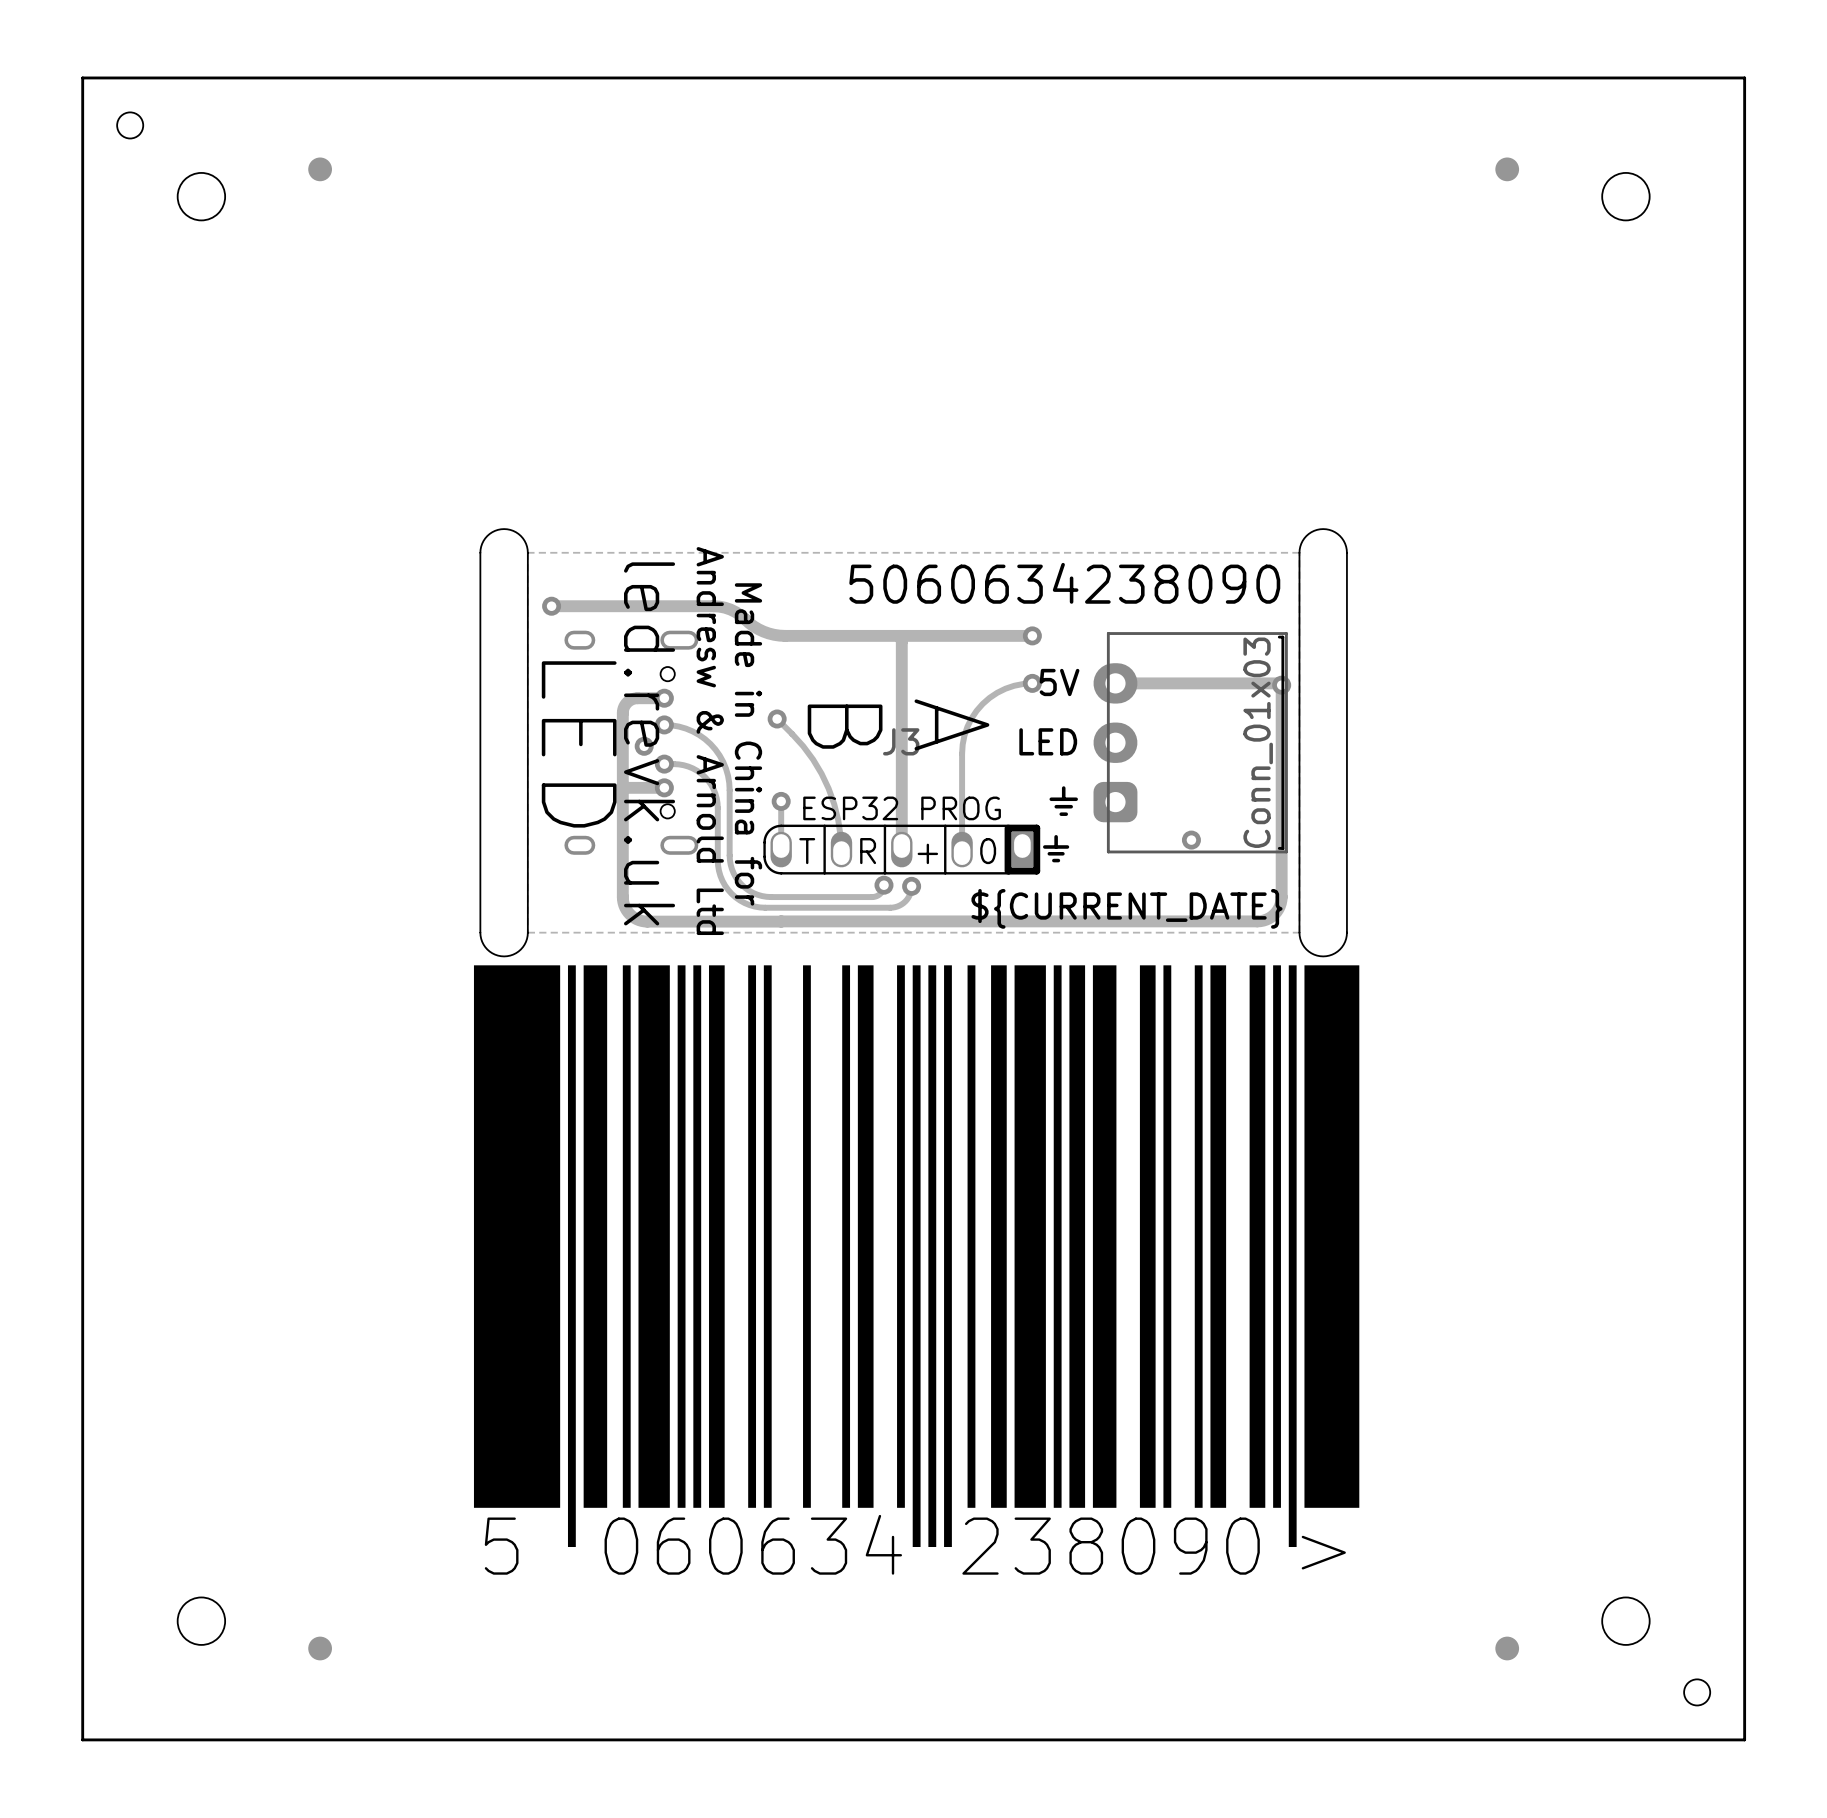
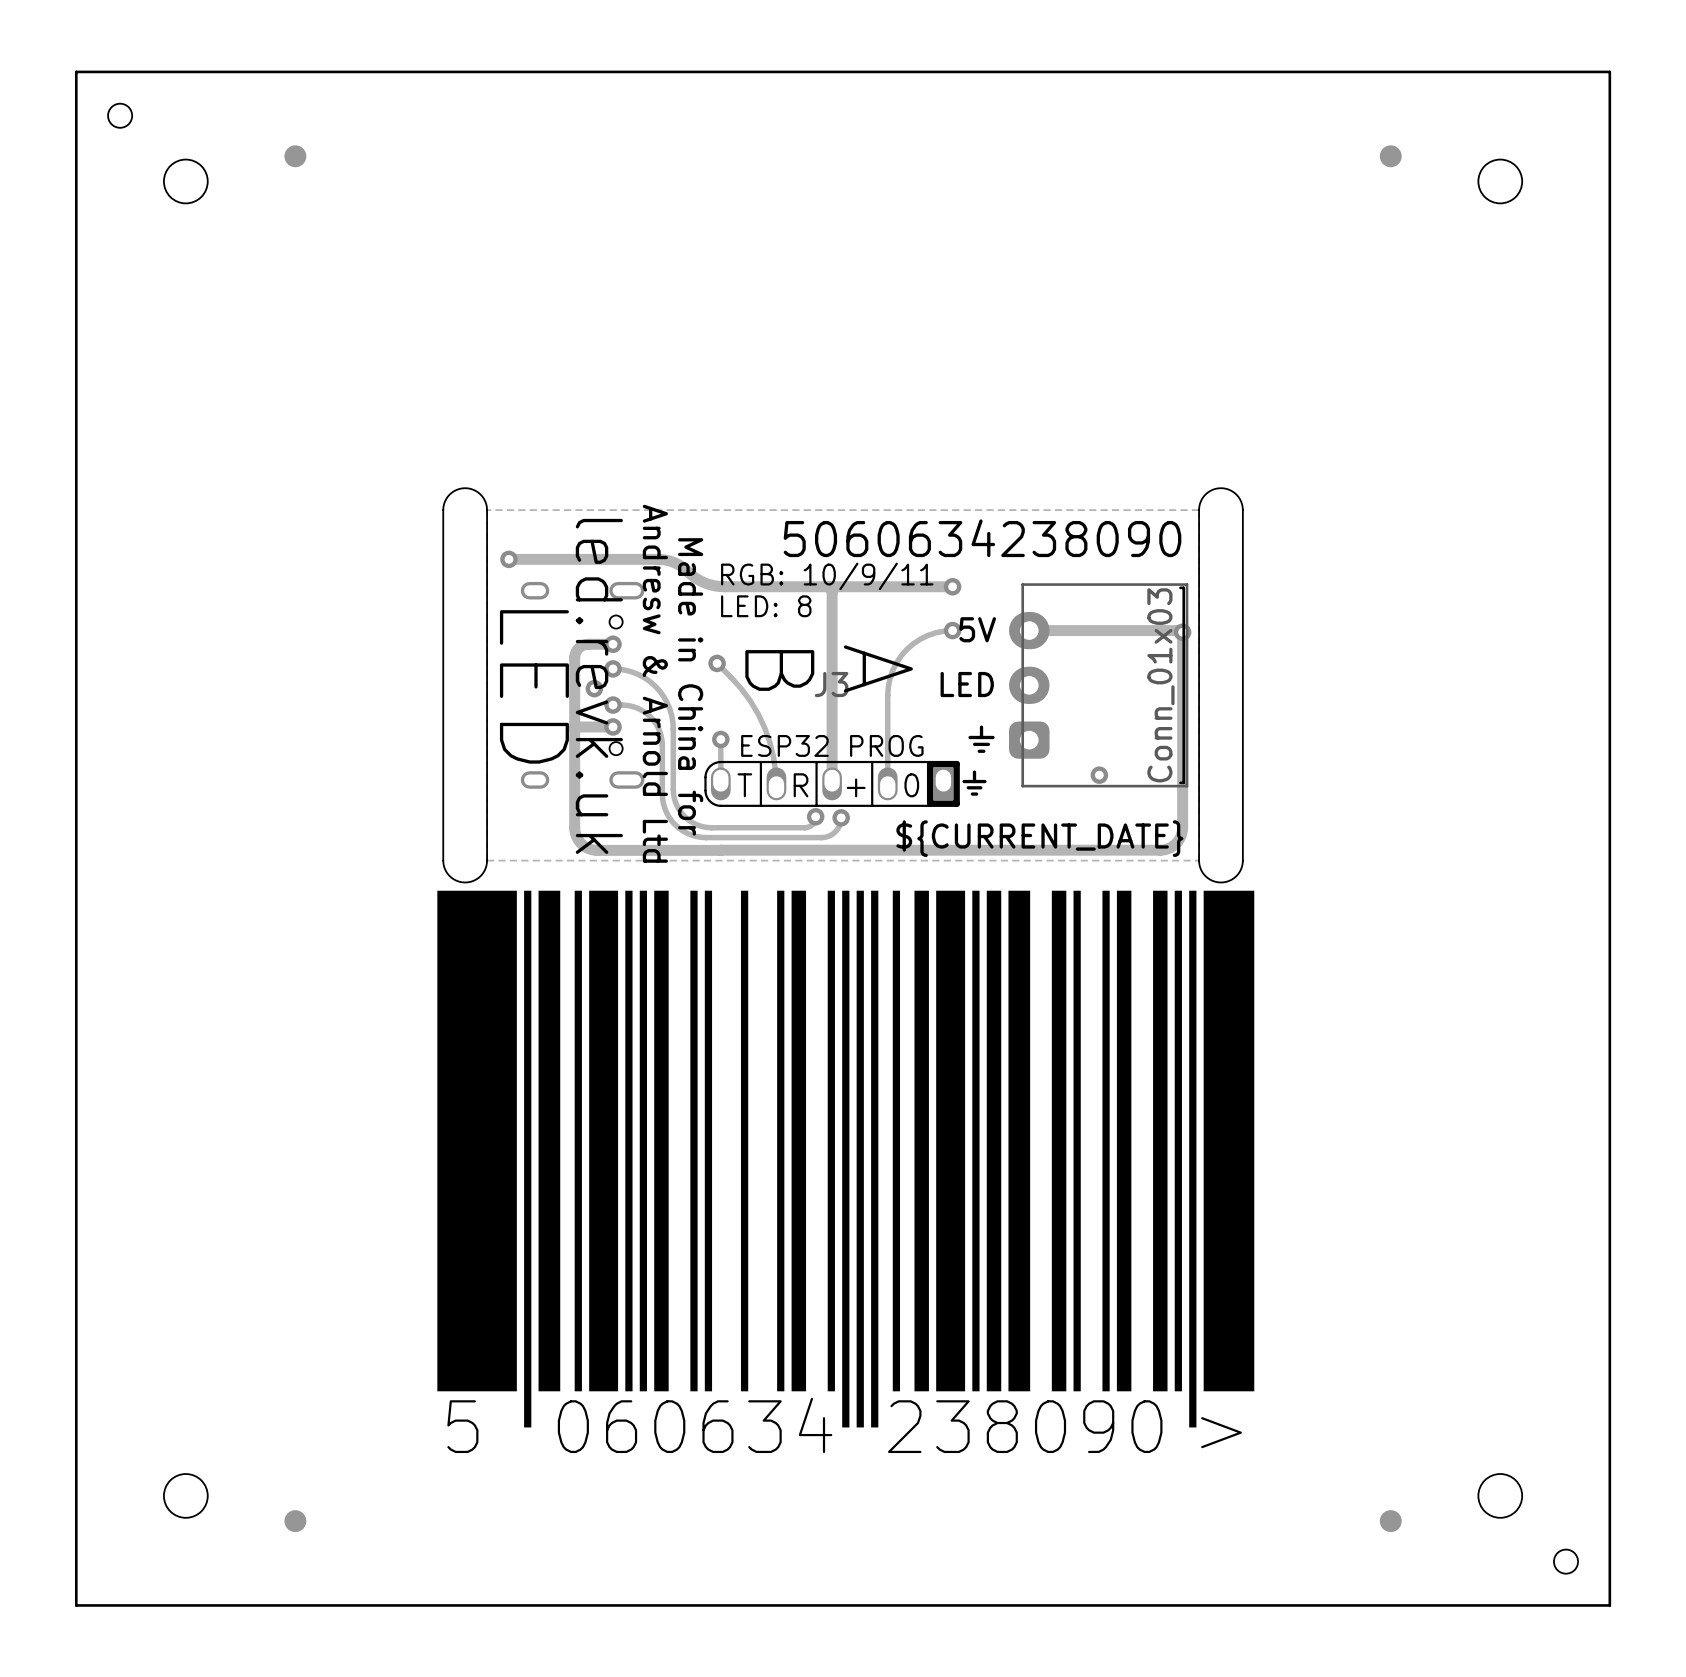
text: none -> RGB: 10/9/11 (827, 576)
text: none -> LED: 8 (766, 606)

